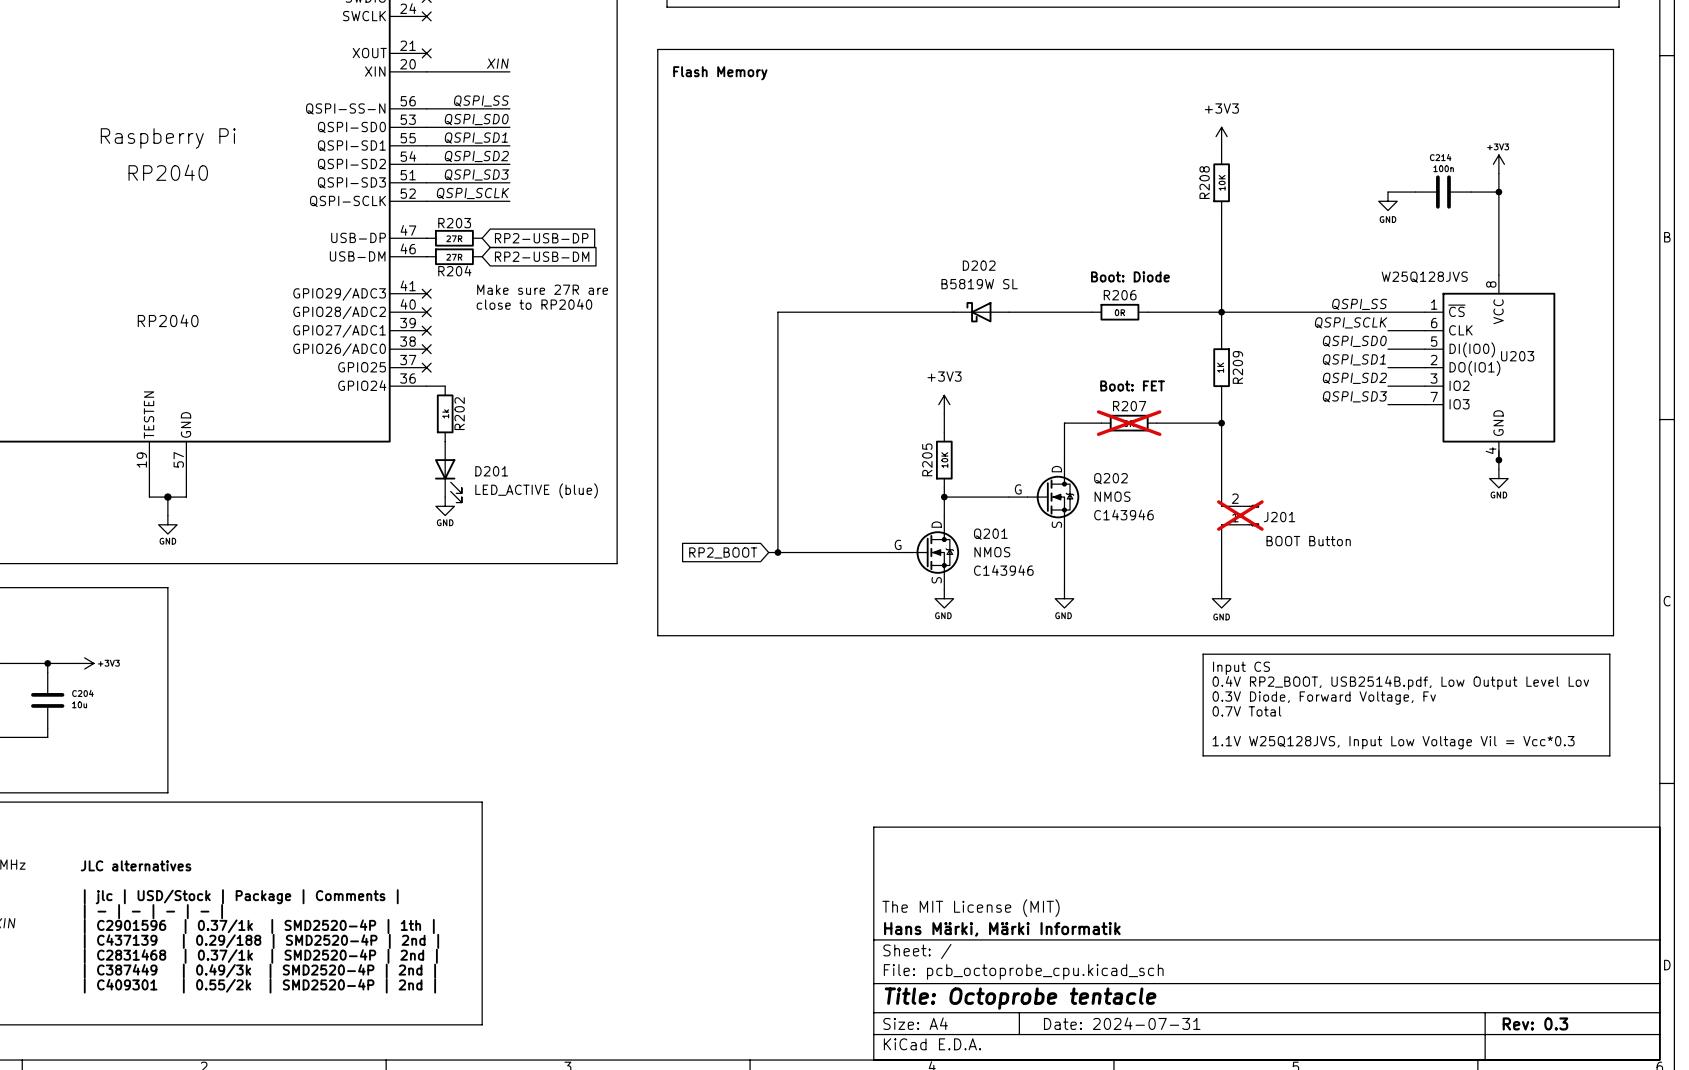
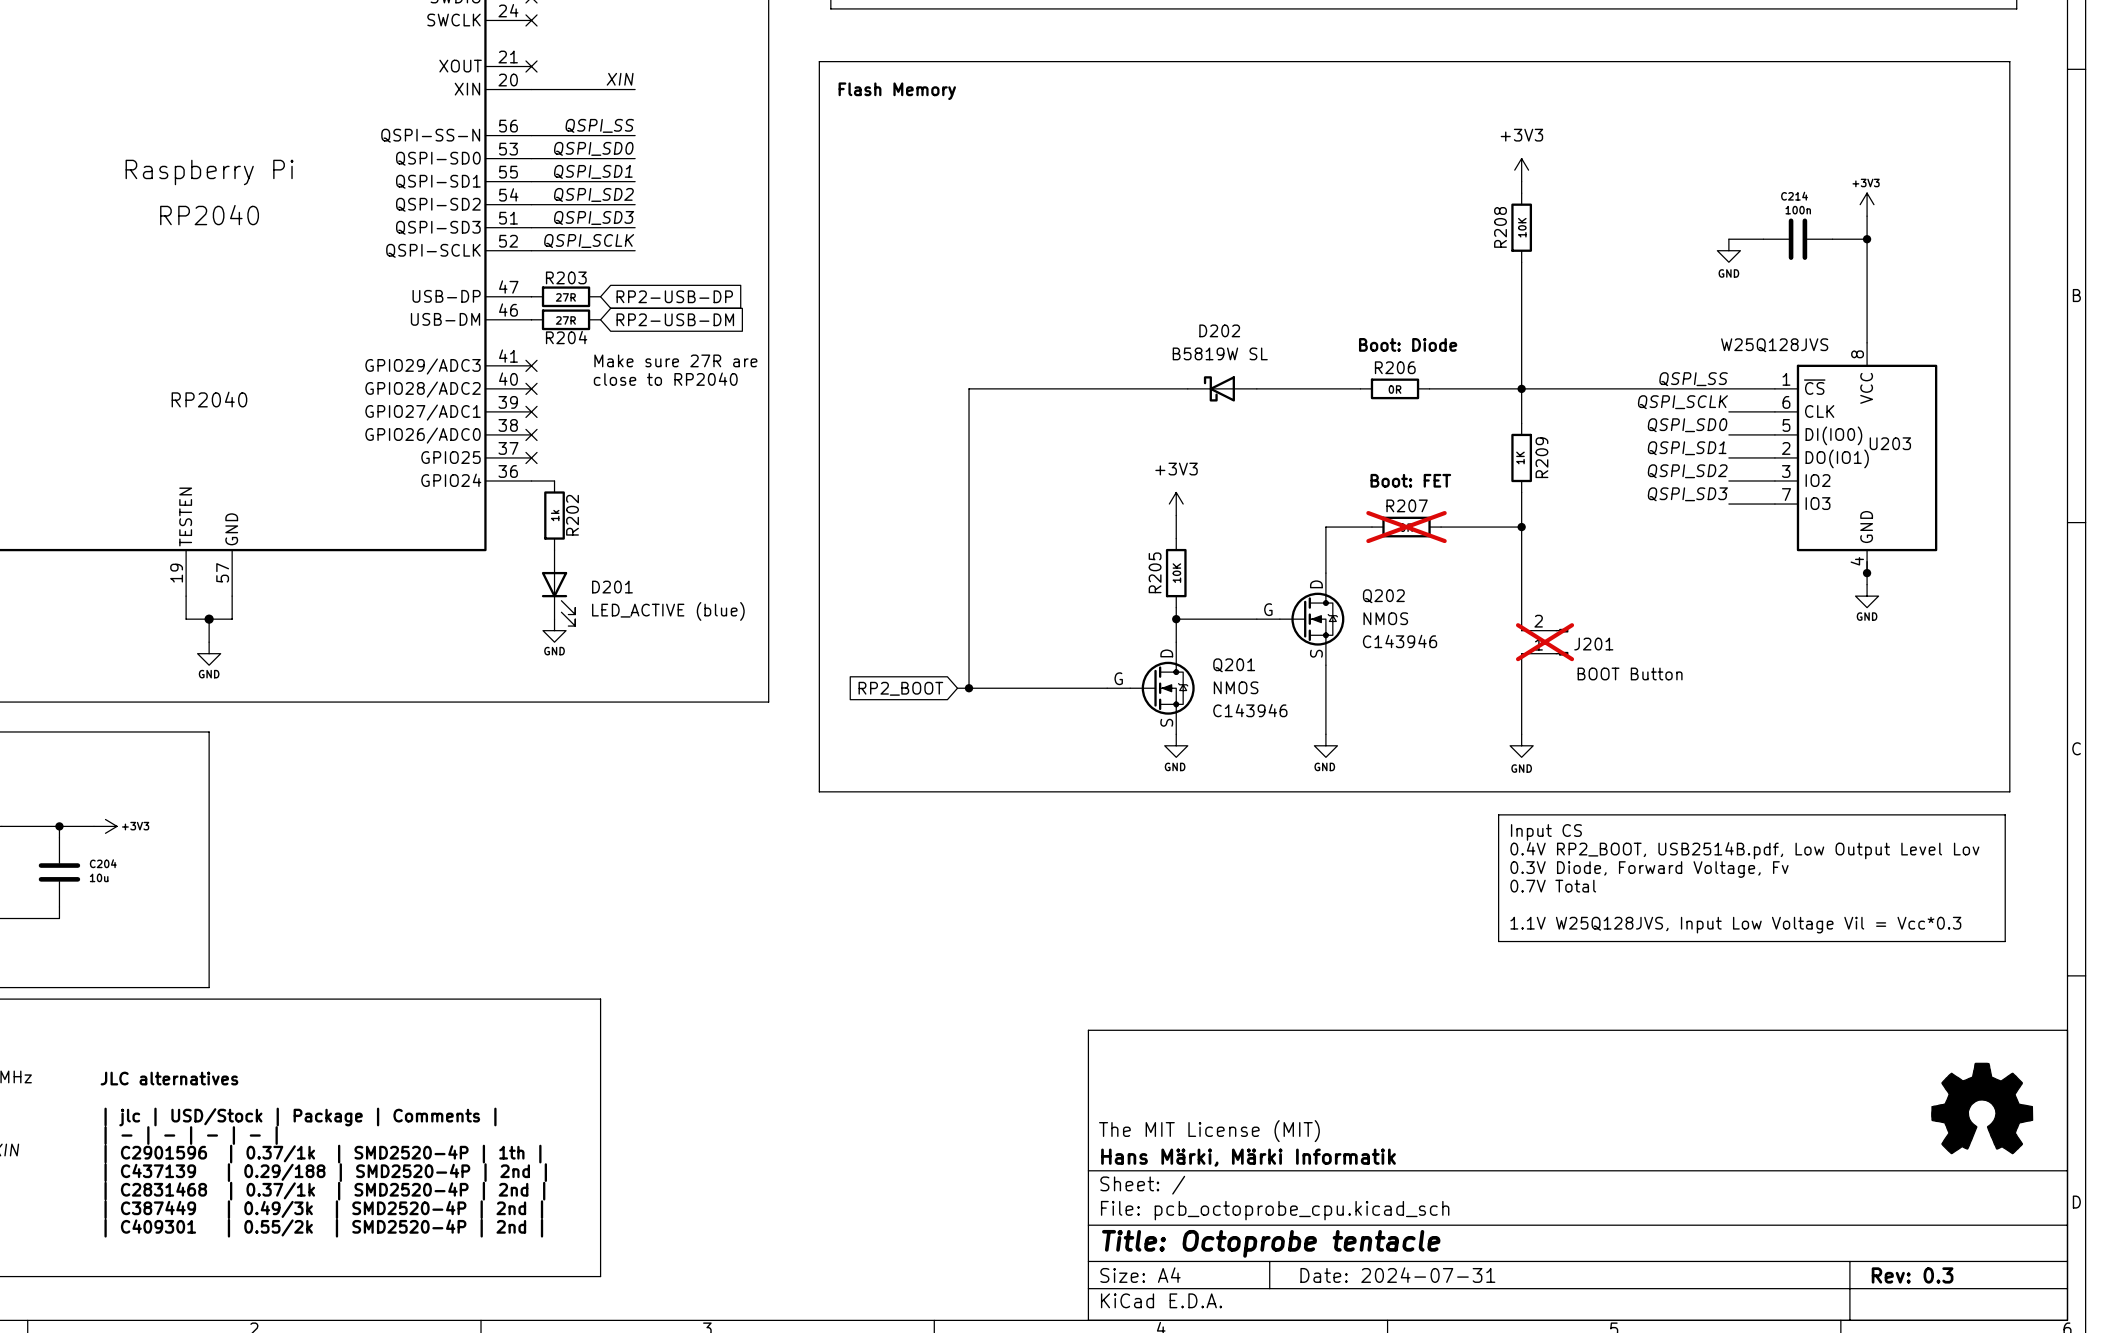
power symbol: none -> (1982, 1108)

